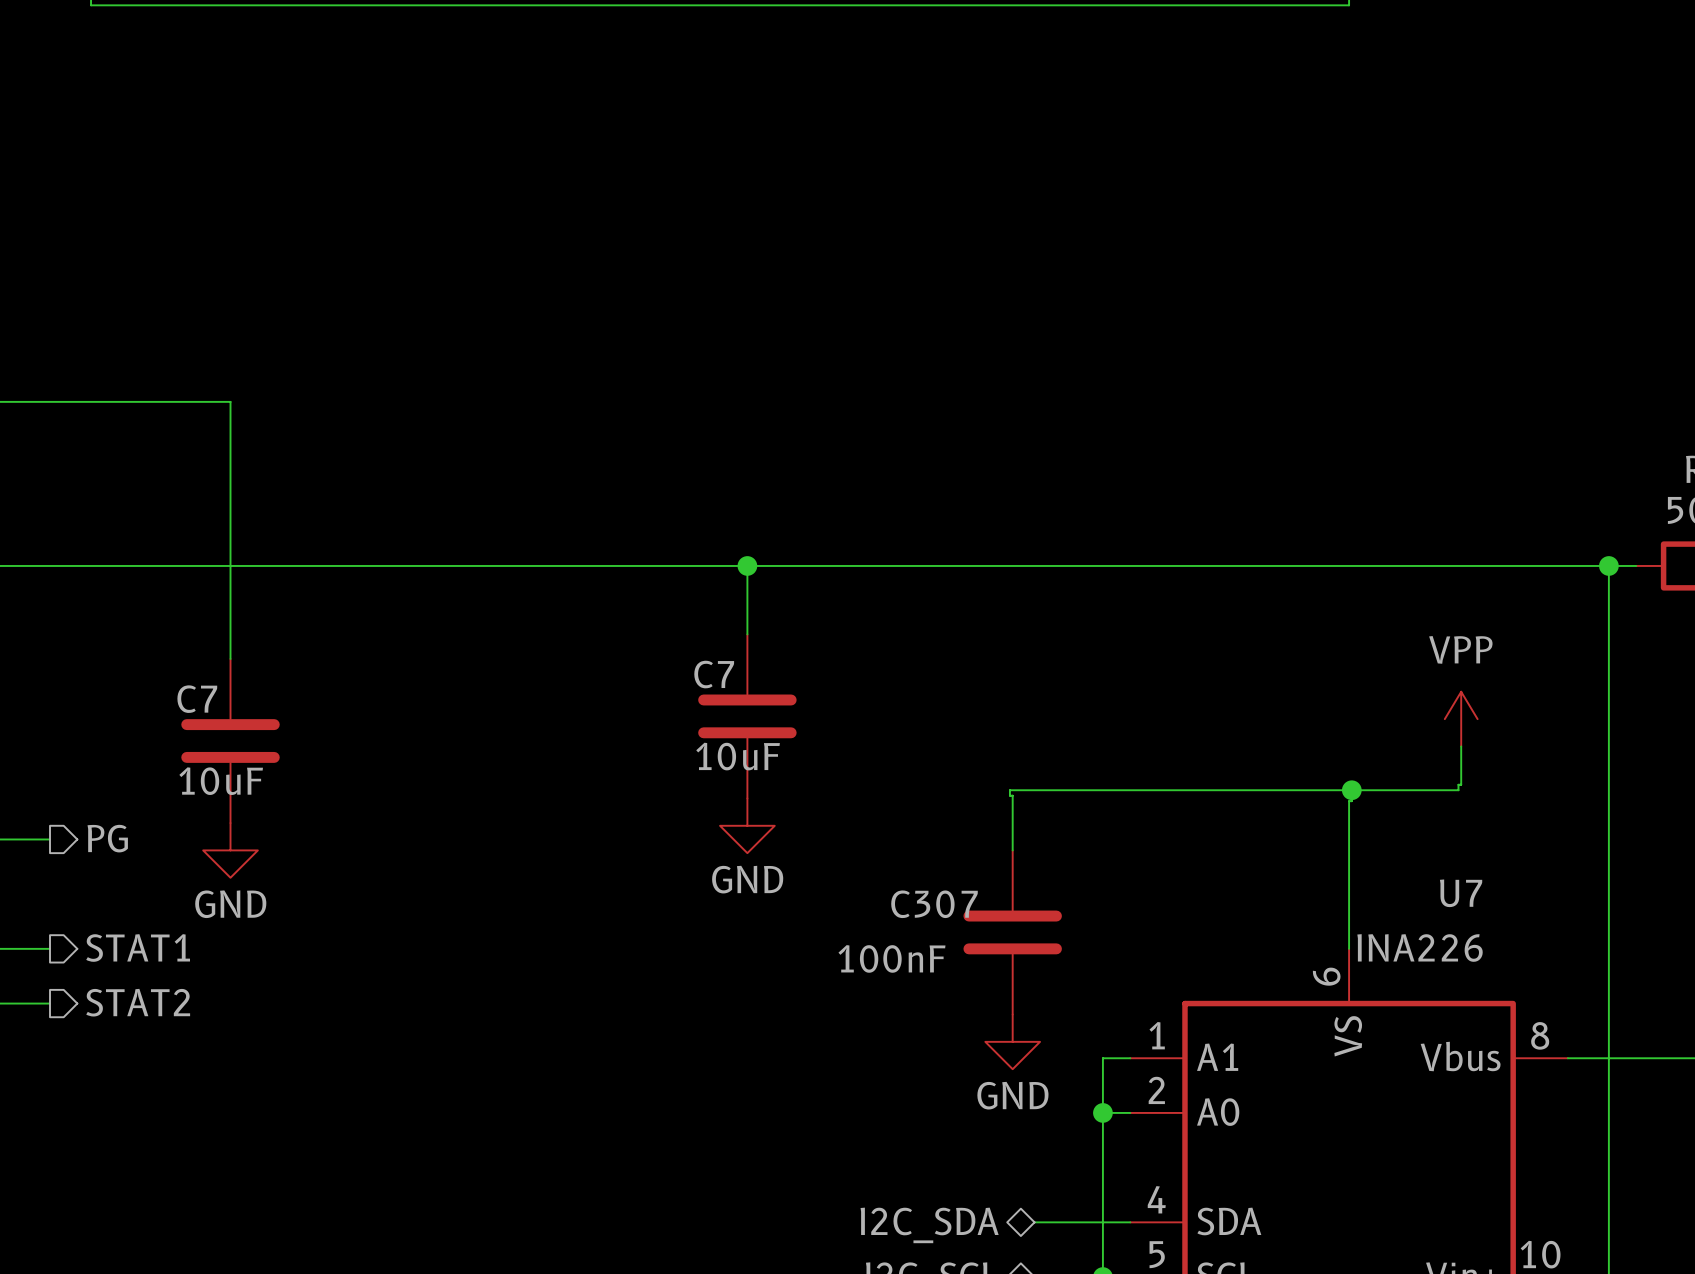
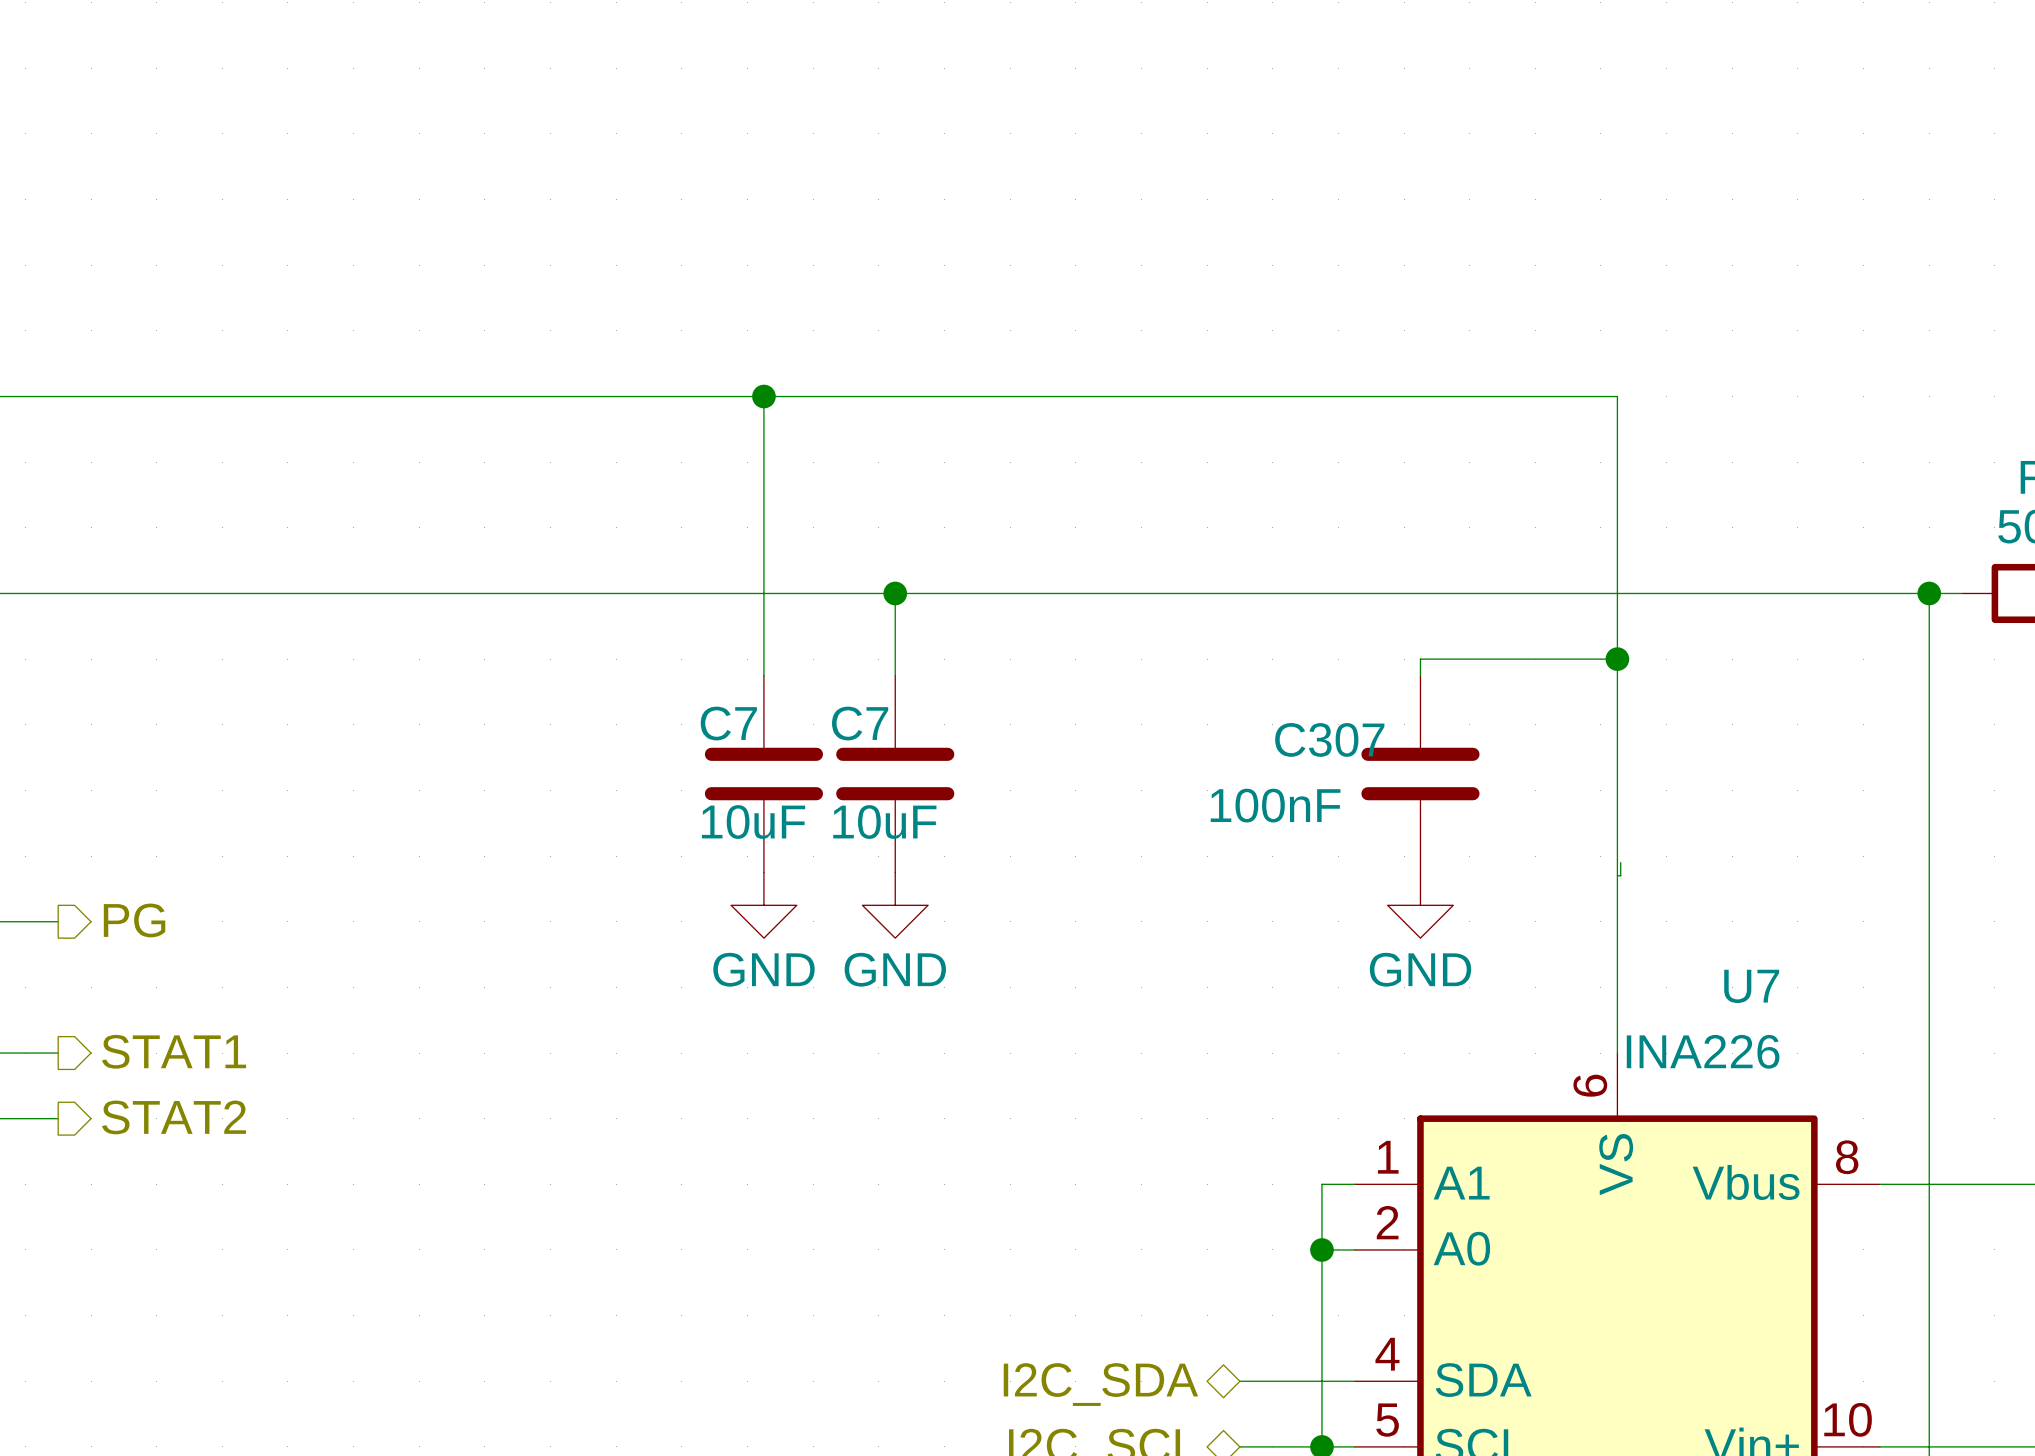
wire: (230, 401) (230, 658) -> (274, 396) (1617, 396) (1617, 875)
wire: none -> (763, 396) (763, 675)
junction: none -> (763, 396)
wire: none -> (1617, 659) (1420, 659) (1420, 675)
junction: none -> (1617, 659)
power symbol: VPP (1461, 719) -> none
C7 position: (230, 741) -> (763, 774)
wire: (1461, 746) (1461, 784) (1458, 784) (1458, 790) (1009, 790) (1009, 795) (1012, 795) (1012, 850) -> none
junction: (1351, 790) -> none
power symbol: none -> GND (763, 905)
power symbol: none -> GND (1420, 905)
power symbol: GND (230, 850) -> none
C307 position: (1012, 932) -> (1420, 774)
power symbol: GND (1012, 1041) -> none

